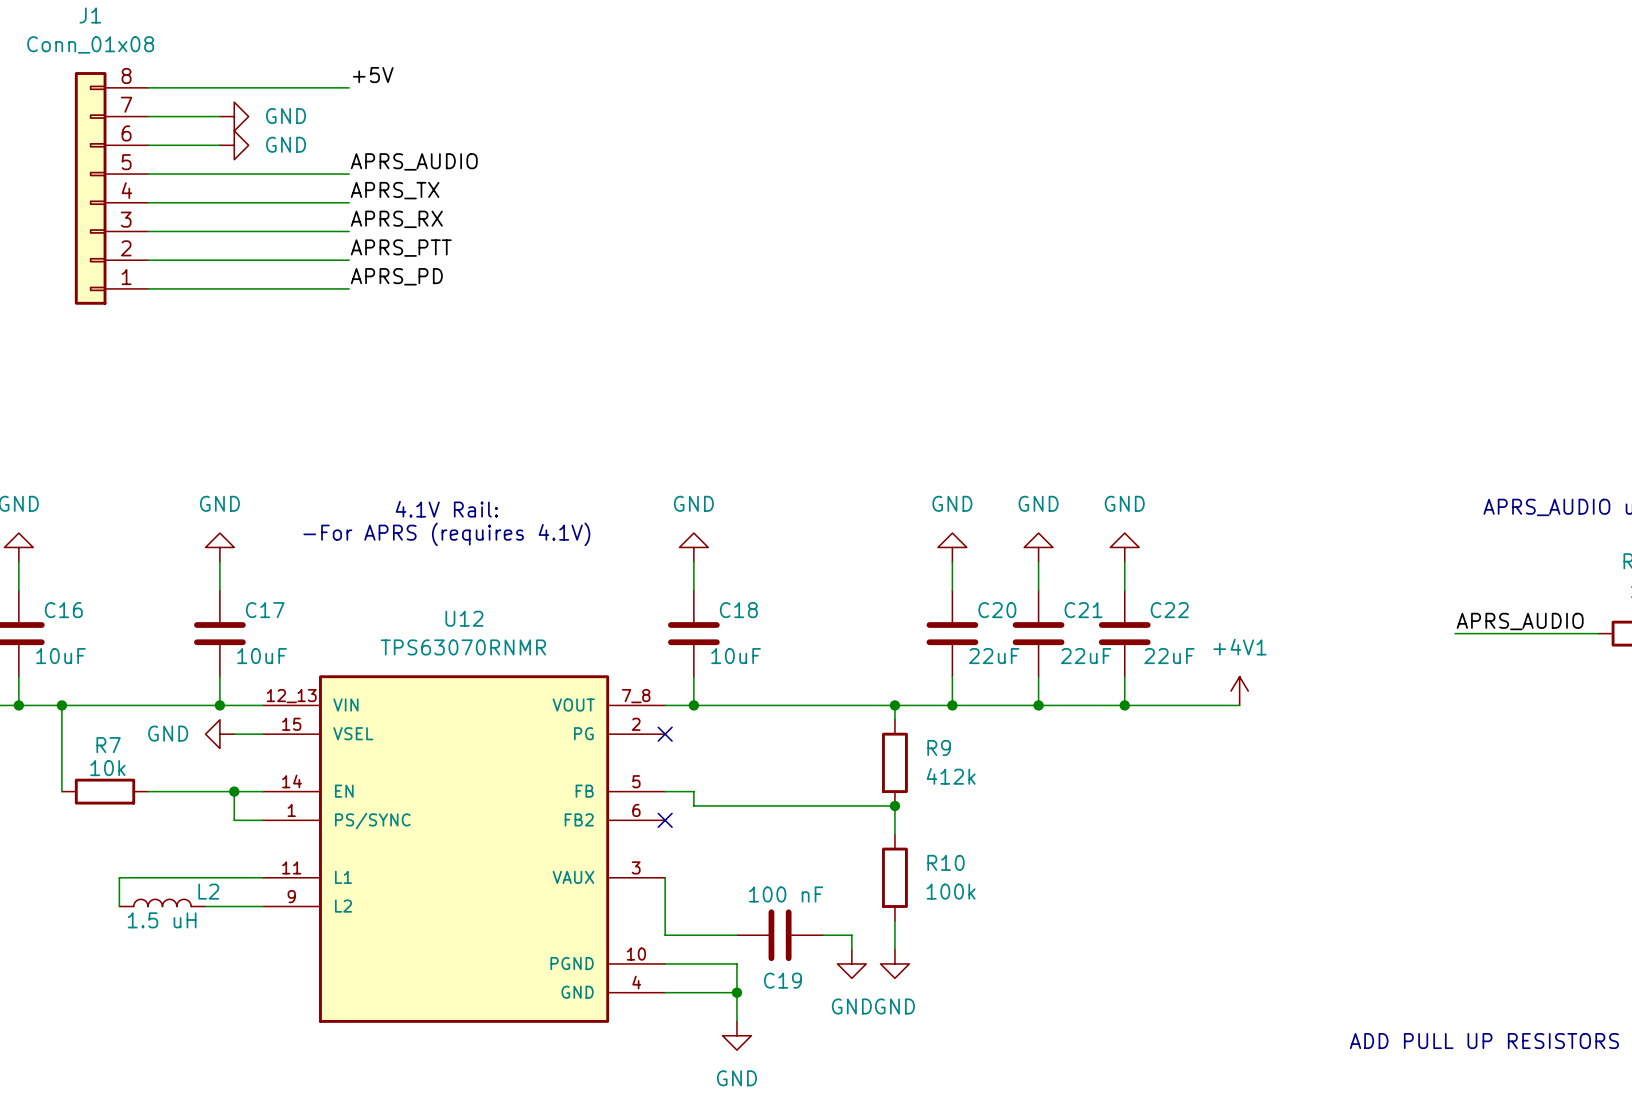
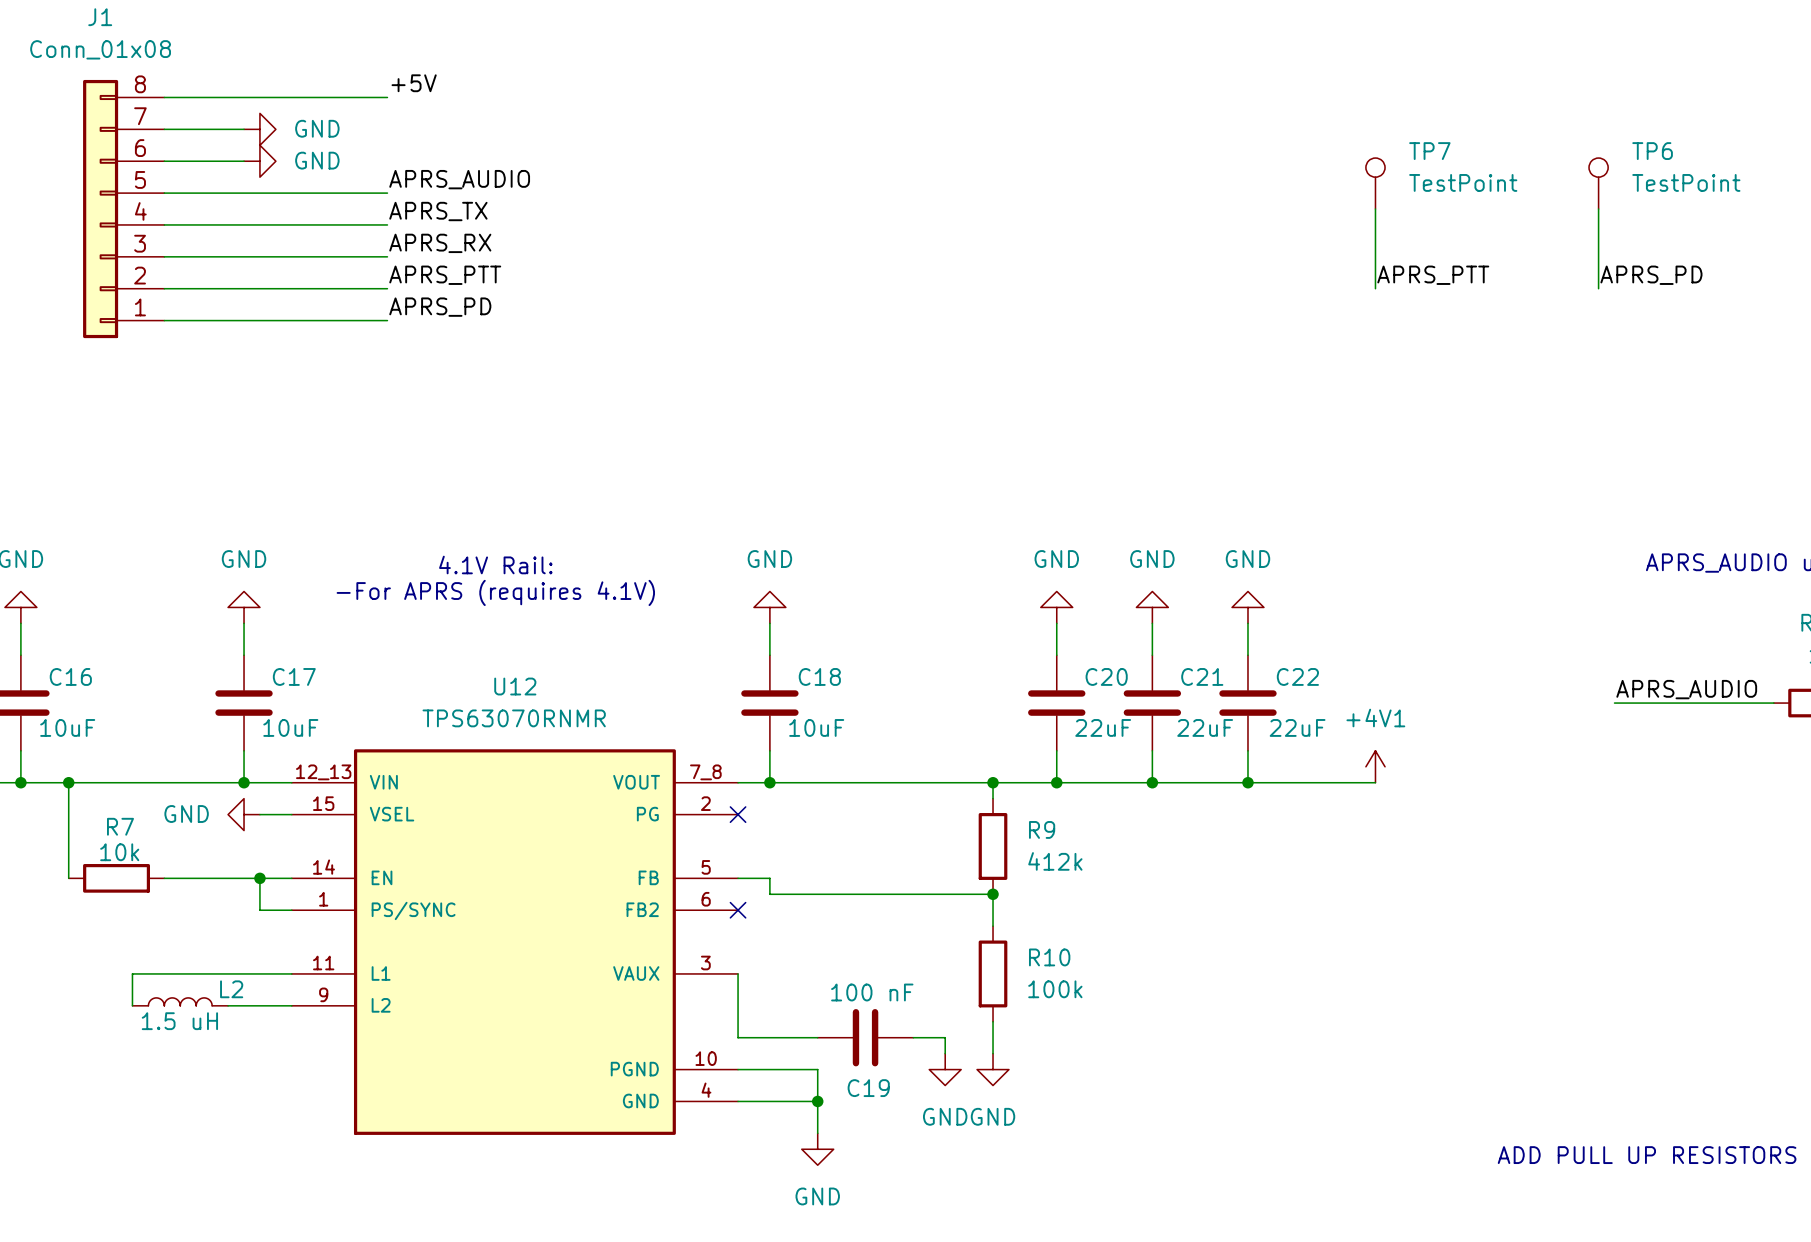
TP7: none -> TestPoint (1375, 183)
TP6: none -> TestPoint (1598, 183)
wire: none -> (1375, 209) (1375, 288)
wire: none -> (1598, 209) (1598, 288)
label: none -> APRS_PTT (1433, 275)
label: none -> APRS_PD (1651, 275)

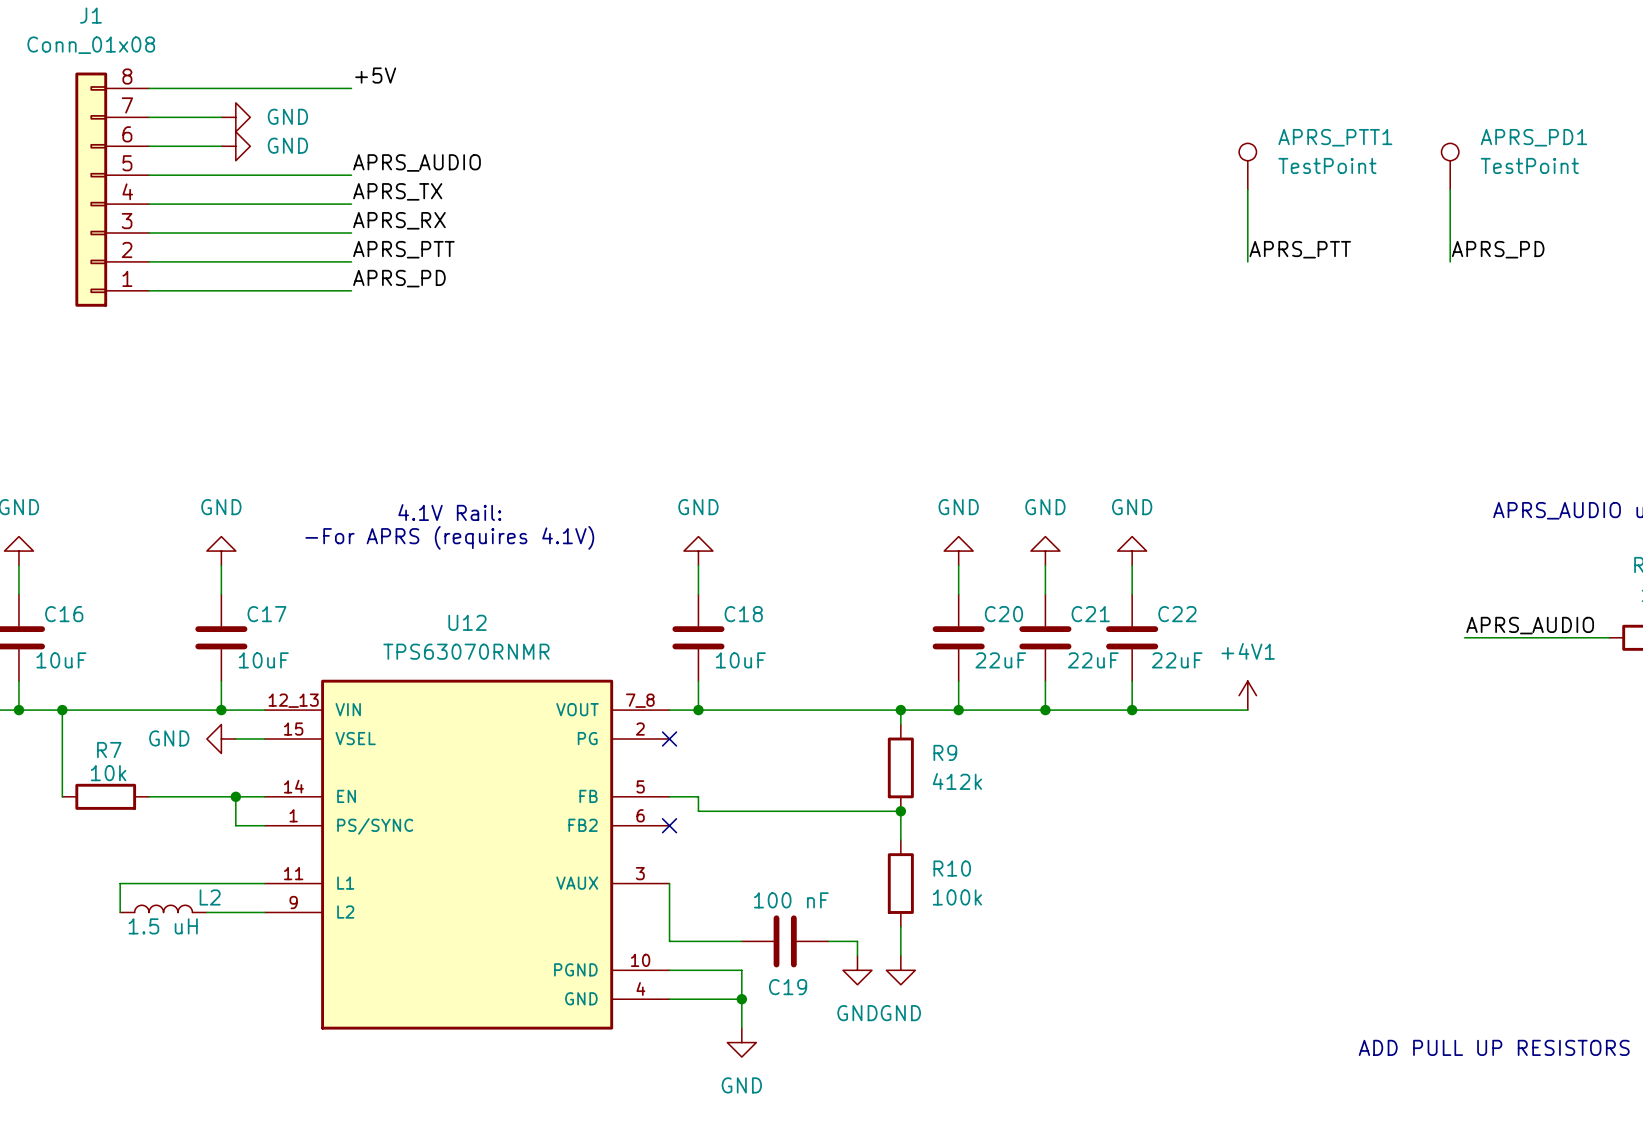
TP7 name: TP7 (1429, 151) -> APRS_PTT1 (1335, 137)
TP6 name: TP6 (1652, 151) -> APRS_PD1 (1533, 137)

